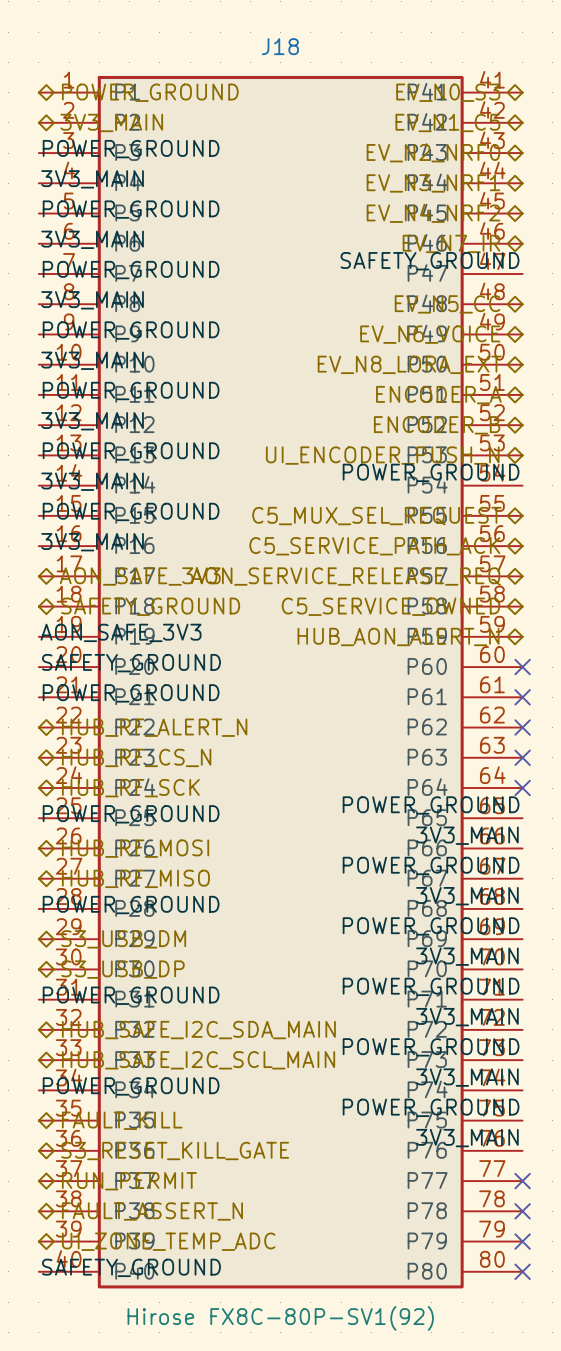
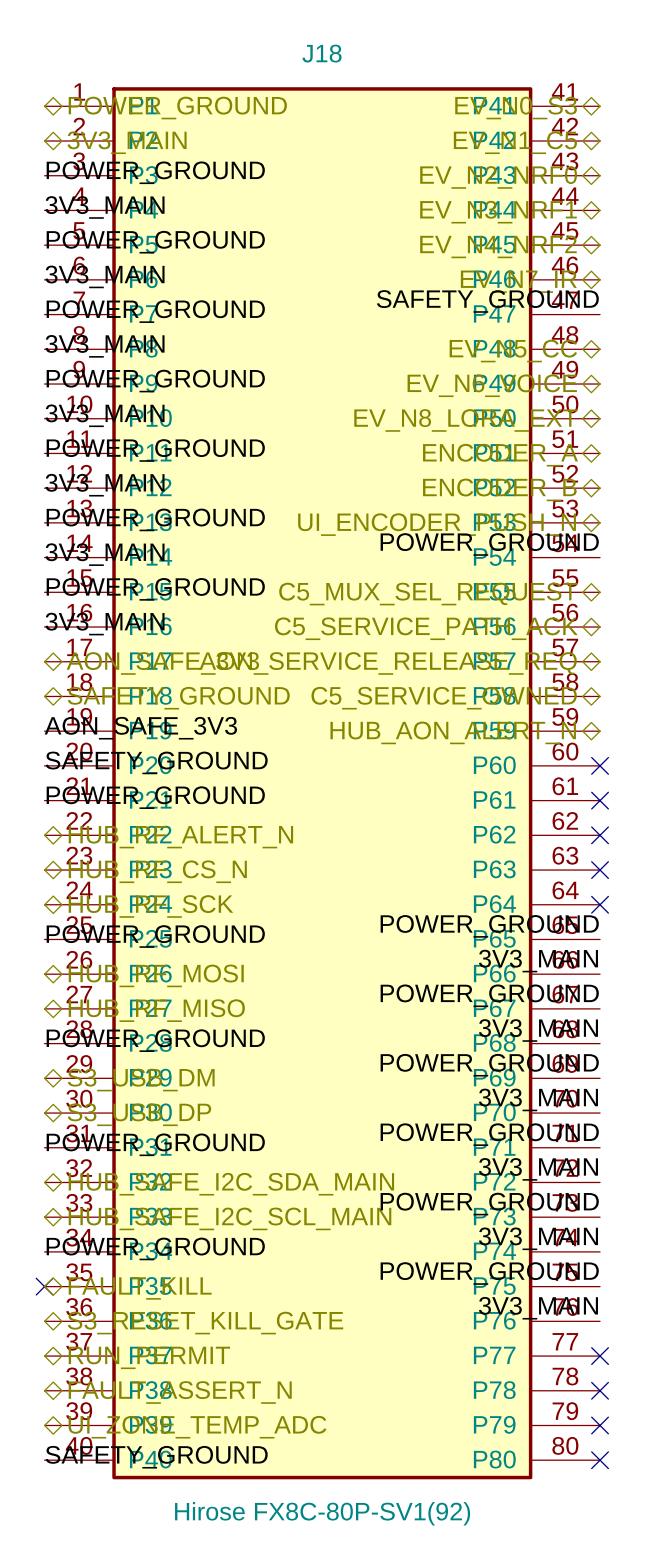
no-connect mark: none -> (44, 1286)

